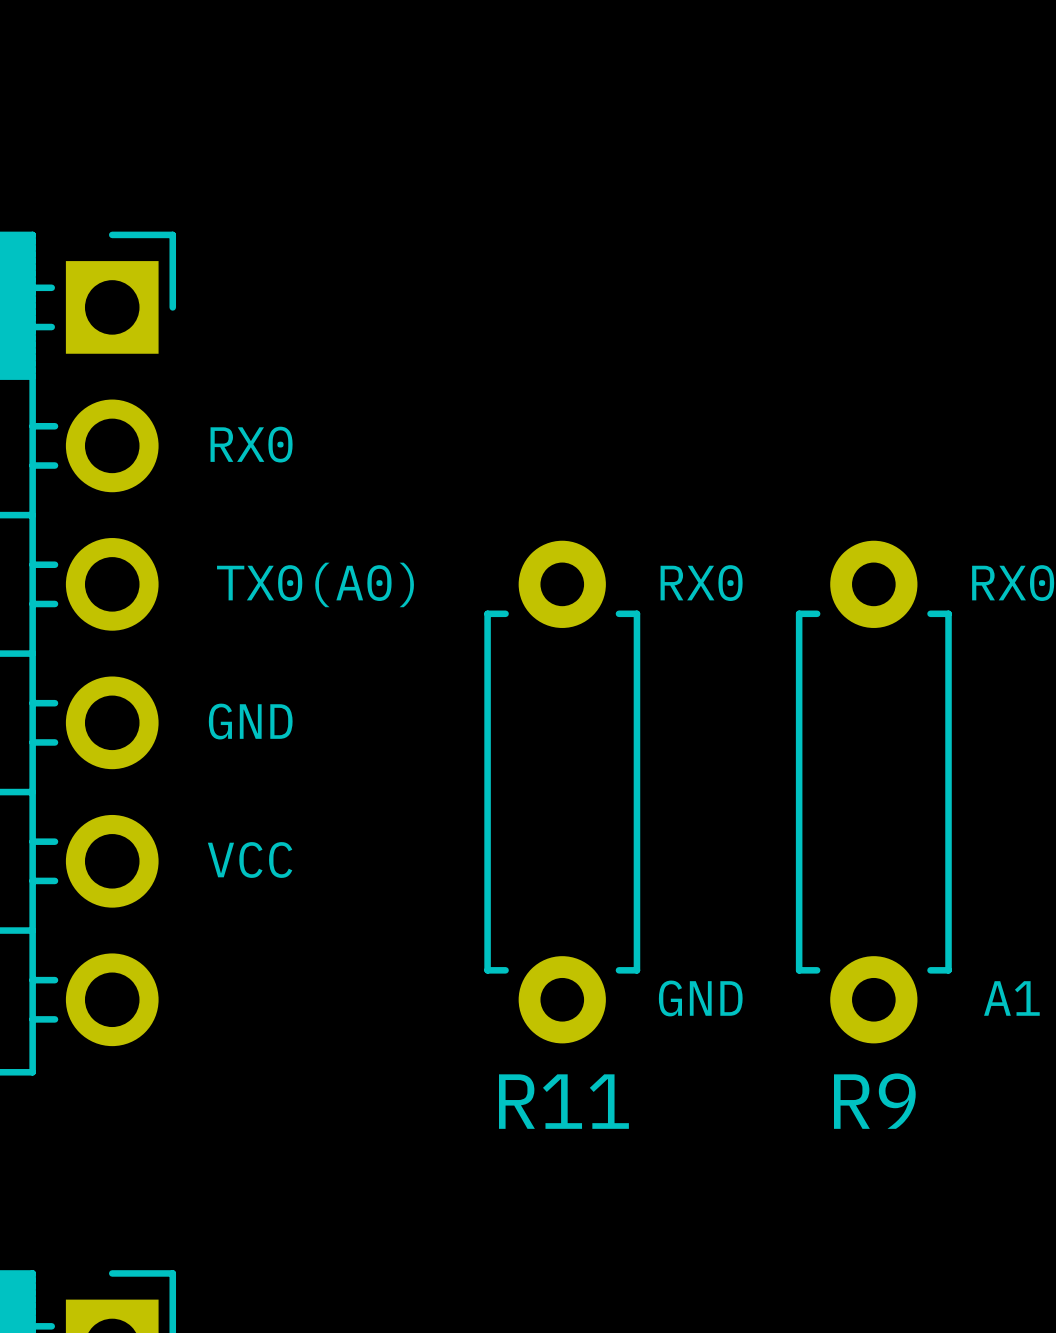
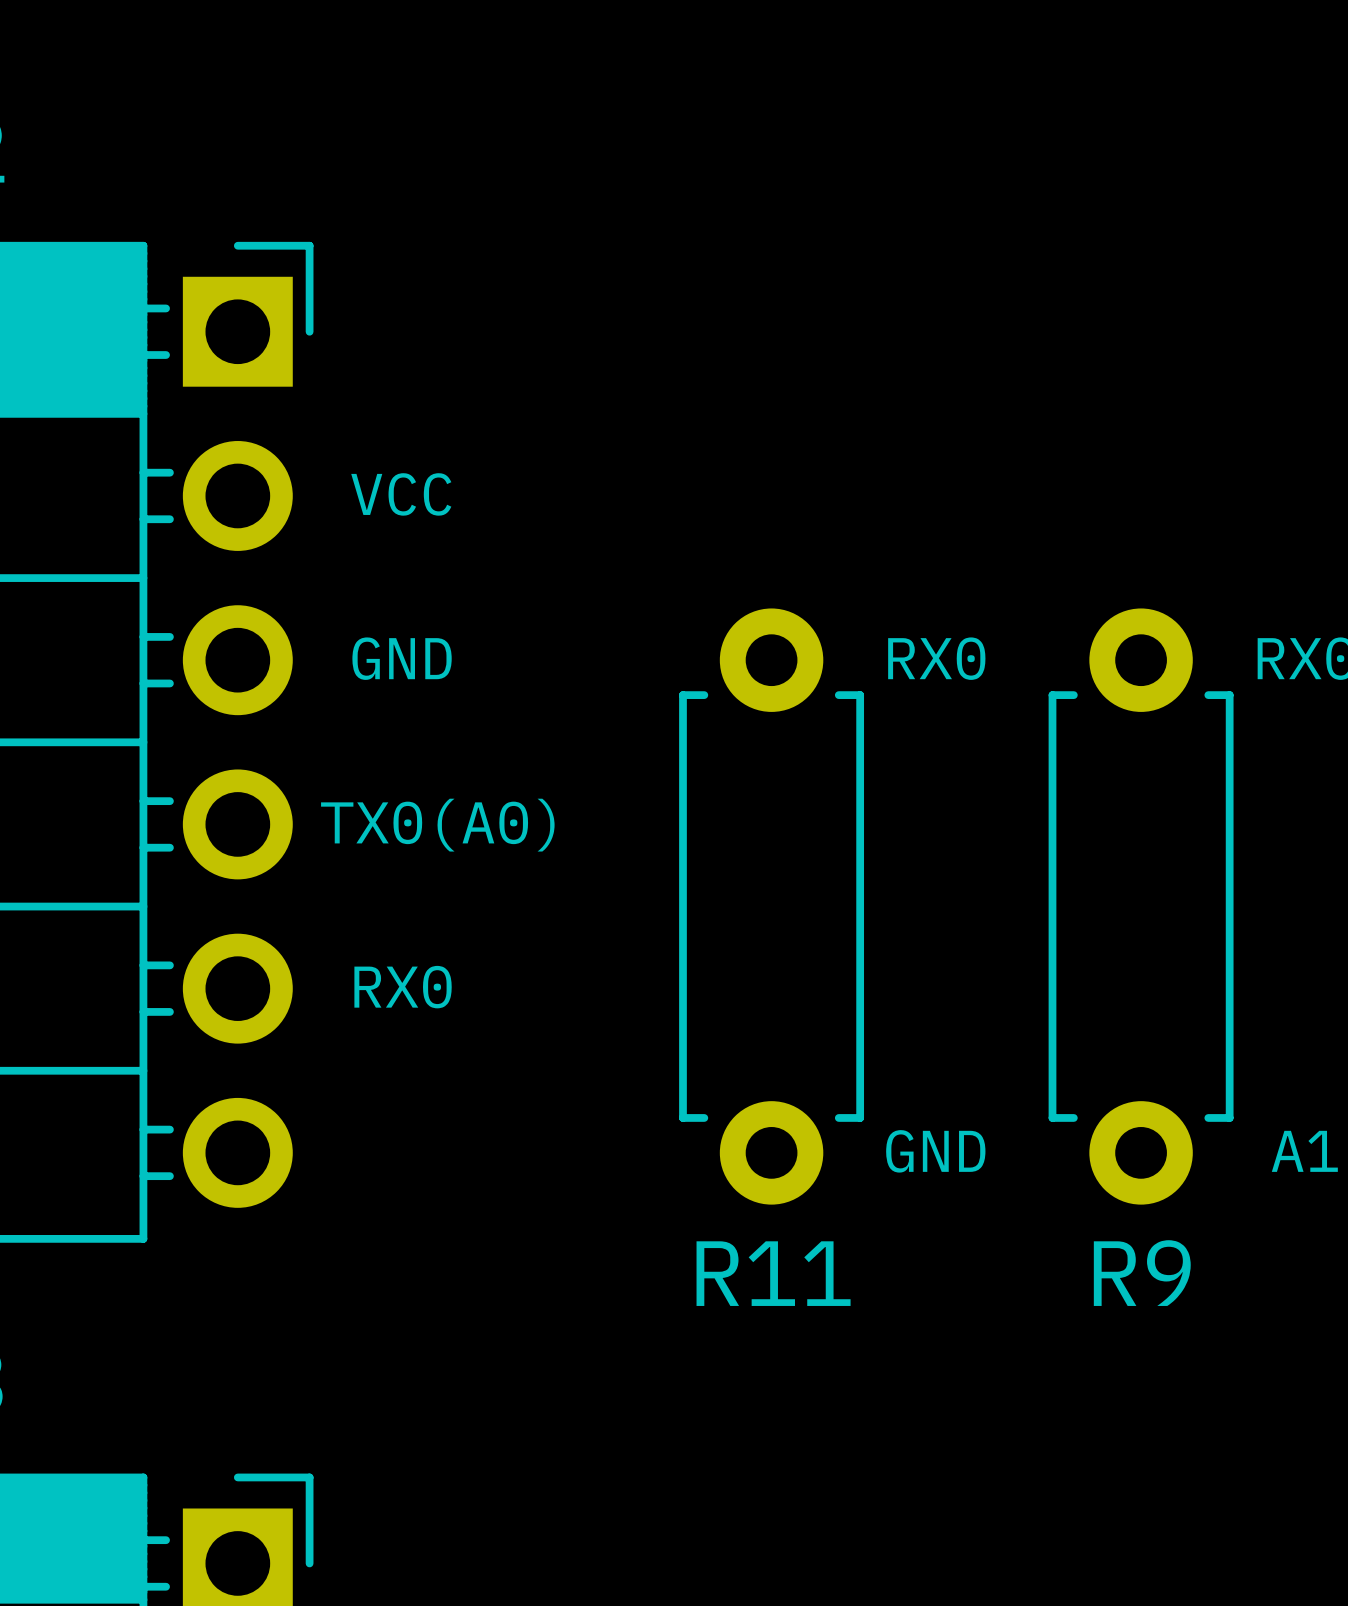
text: RX0 (251, 444) -> VCC (401, 494)
text position: TX0(A0) (315, 584) -> TX0(A0) (437, 825)
text position: GND (250, 721) -> GND (402, 658)
text: VCC (250, 860) -> RX0 (403, 987)

